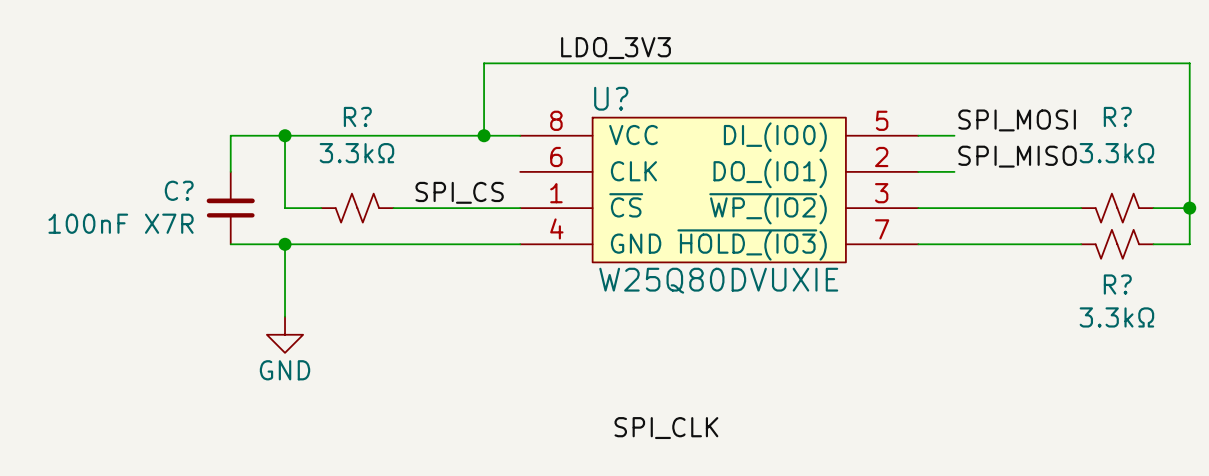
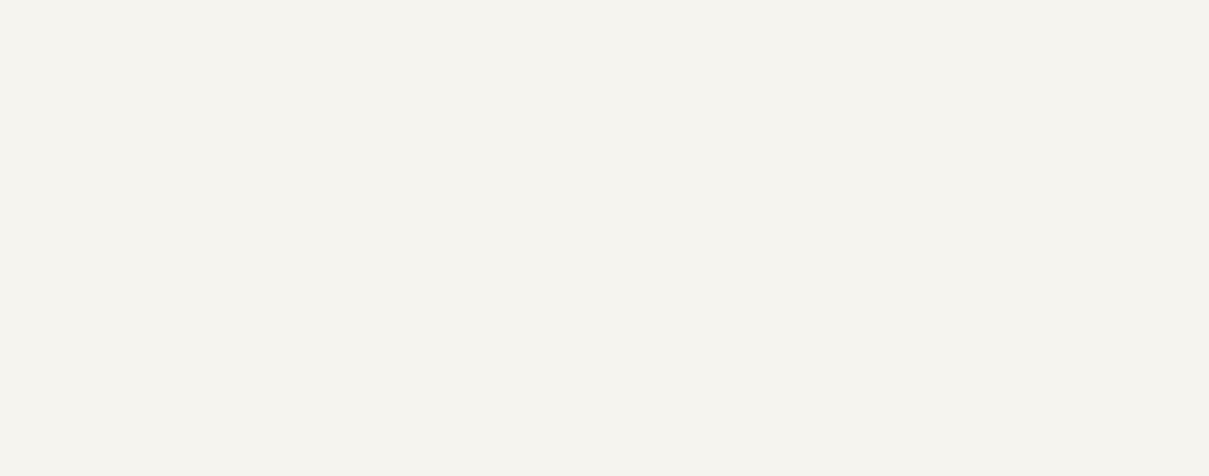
label: LDO_3V3 (616, 48) -> none
label: SPI_MOSI (1017, 120) -> none
wire: (285, 135) (285, 208) (321, 208) -> none
junction: (285, 135) -> none
wire: (484, 135) (484, 63) (1189, 63) (1189, 244) (1153, 244) -> none
junction: (484, 135) -> none
wire: (520, 135) (230, 135) (230, 171) -> none
wire: (918, 135) (954, 135) -> none
label: SPI_MISO (1017, 156) -> none
wire: (918, 171) (954, 171) -> none
U?: W25Q80DVUXIE (719, 190) -> none
label: SPI_CS (459, 192) -> none
C?: 100nF X7R (230, 208) -> none
R?: 3.3kΩ (357, 208) -> none
wire: (393, 208) (520, 208) -> none
wire: (918, 208) (1081, 208) -> none
R?: 3.3kΩ (1117, 208) -> none
wire: (1153, 208) (1189, 208) -> none
junction: (1189, 208) -> none
wire: (230, 244) (520, 244) -> none
wire: (285, 244) (285, 316) -> none
junction: (285, 244) -> none
wire: (918, 244) (1081, 244) -> none
R?: 3.3kΩ (1117, 244) -> none
power symbol: GND (285, 334) -> none
label: SPI_CLK (666, 428) -> none

